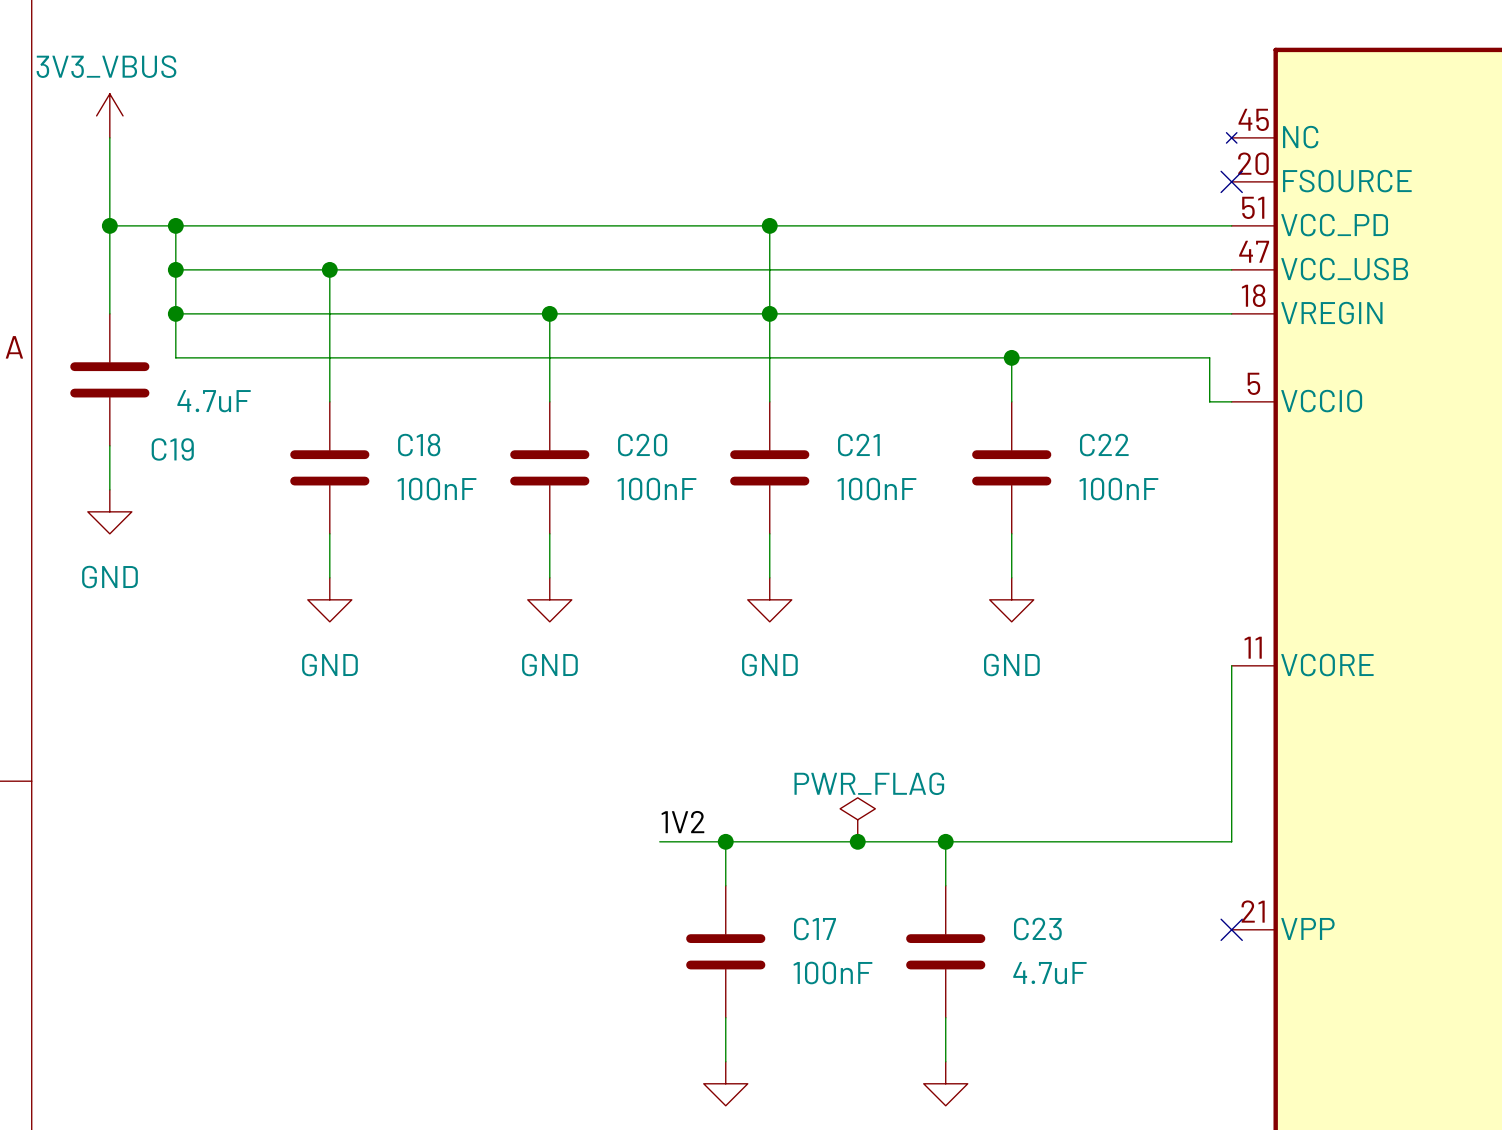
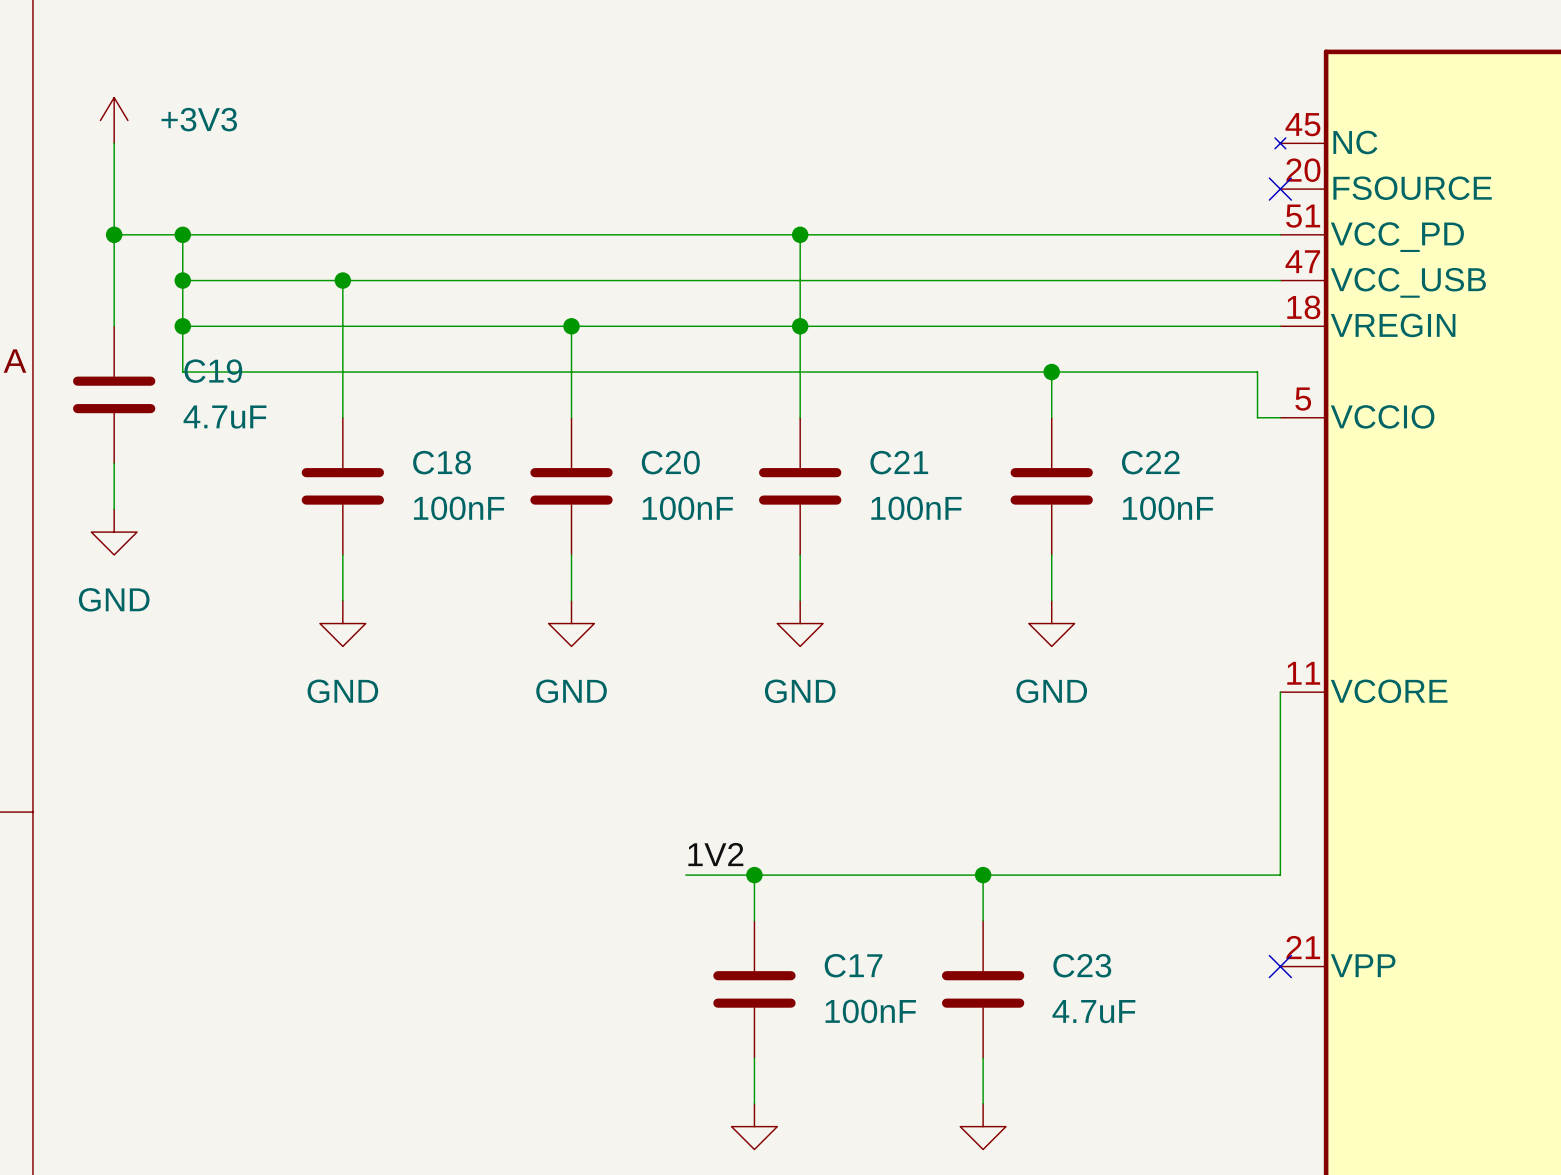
power symbol: 3V3_VBUS (109, 115) -> +3V3 (114, 120)
C19 name position: C19 (172, 449) -> C19 (213, 371)
power symbol: PWR_FLAG (857, 819) -> none
junction: (857, 841) -> none

